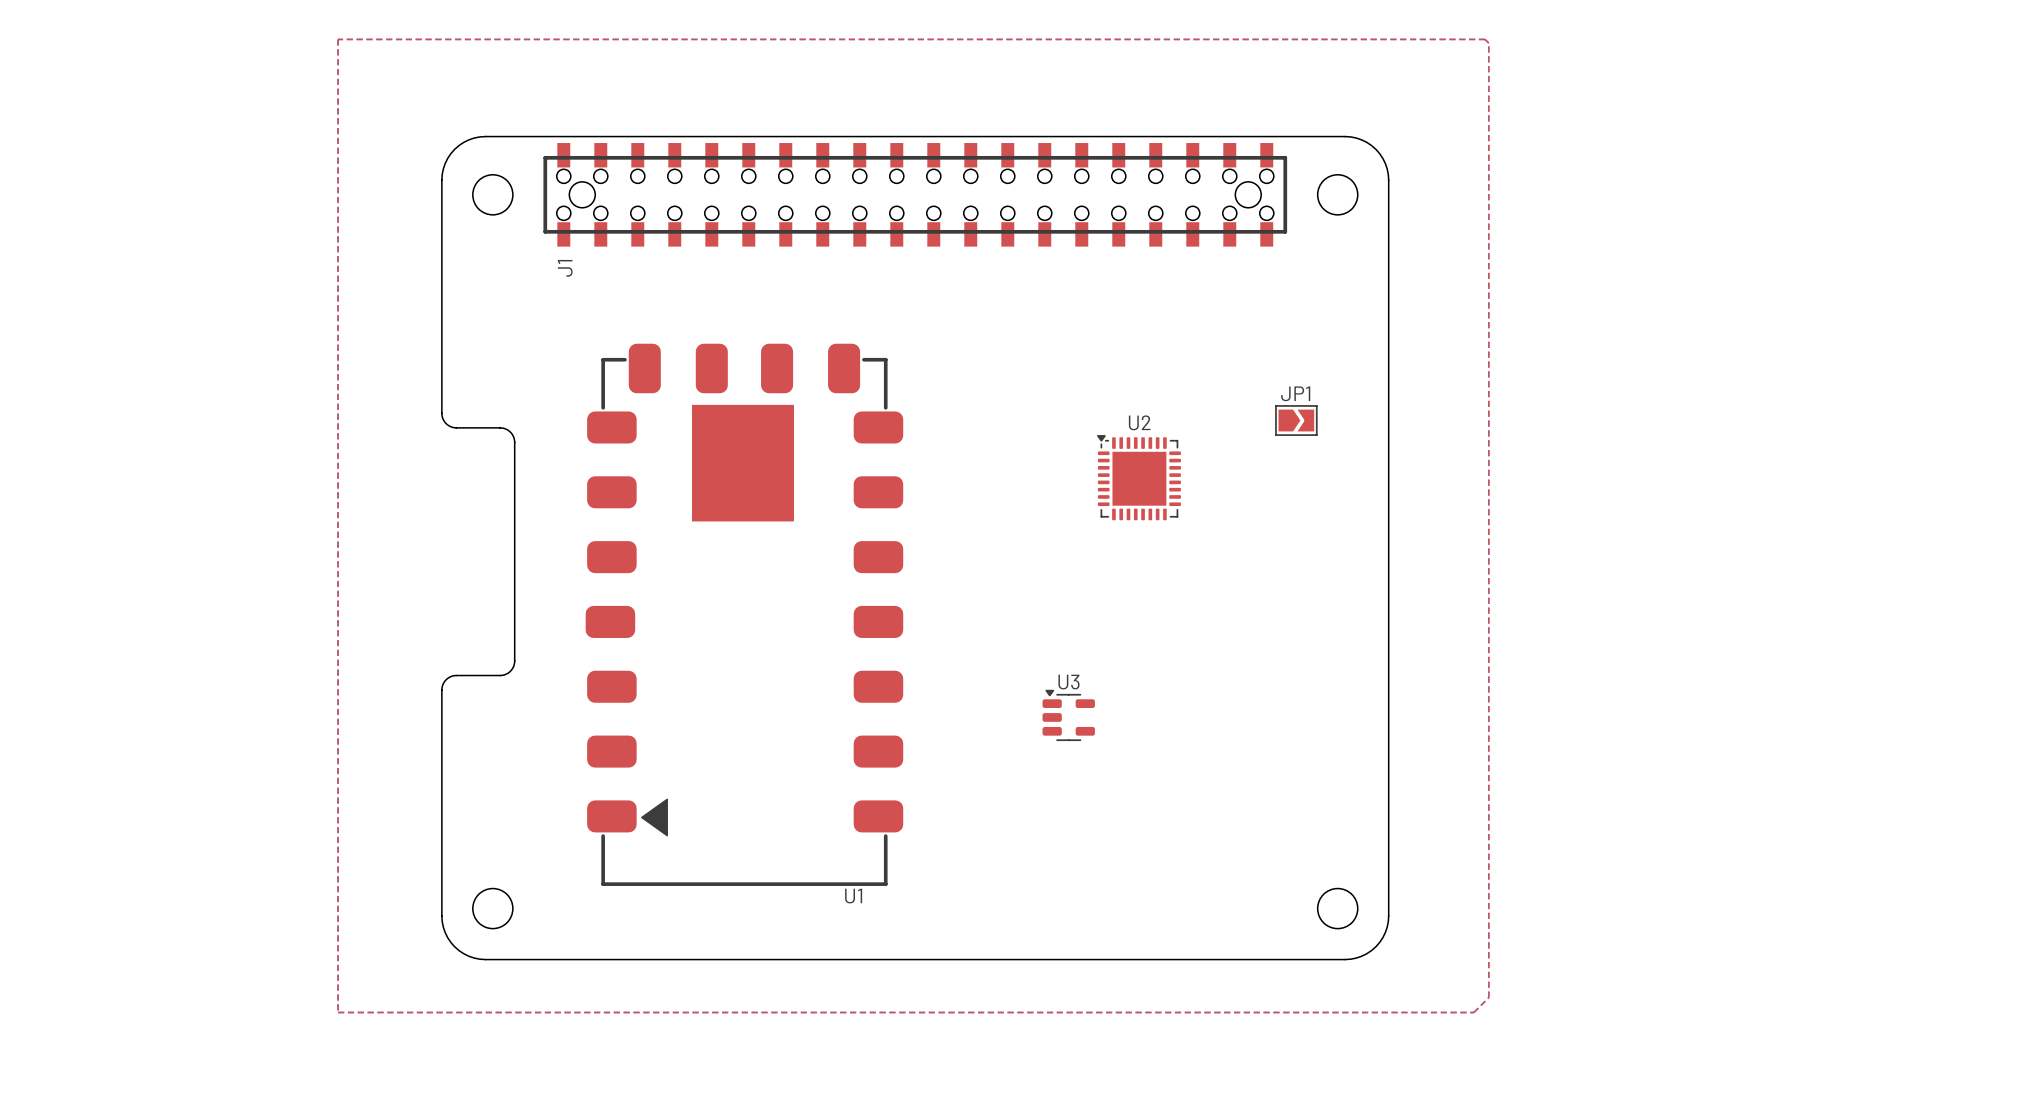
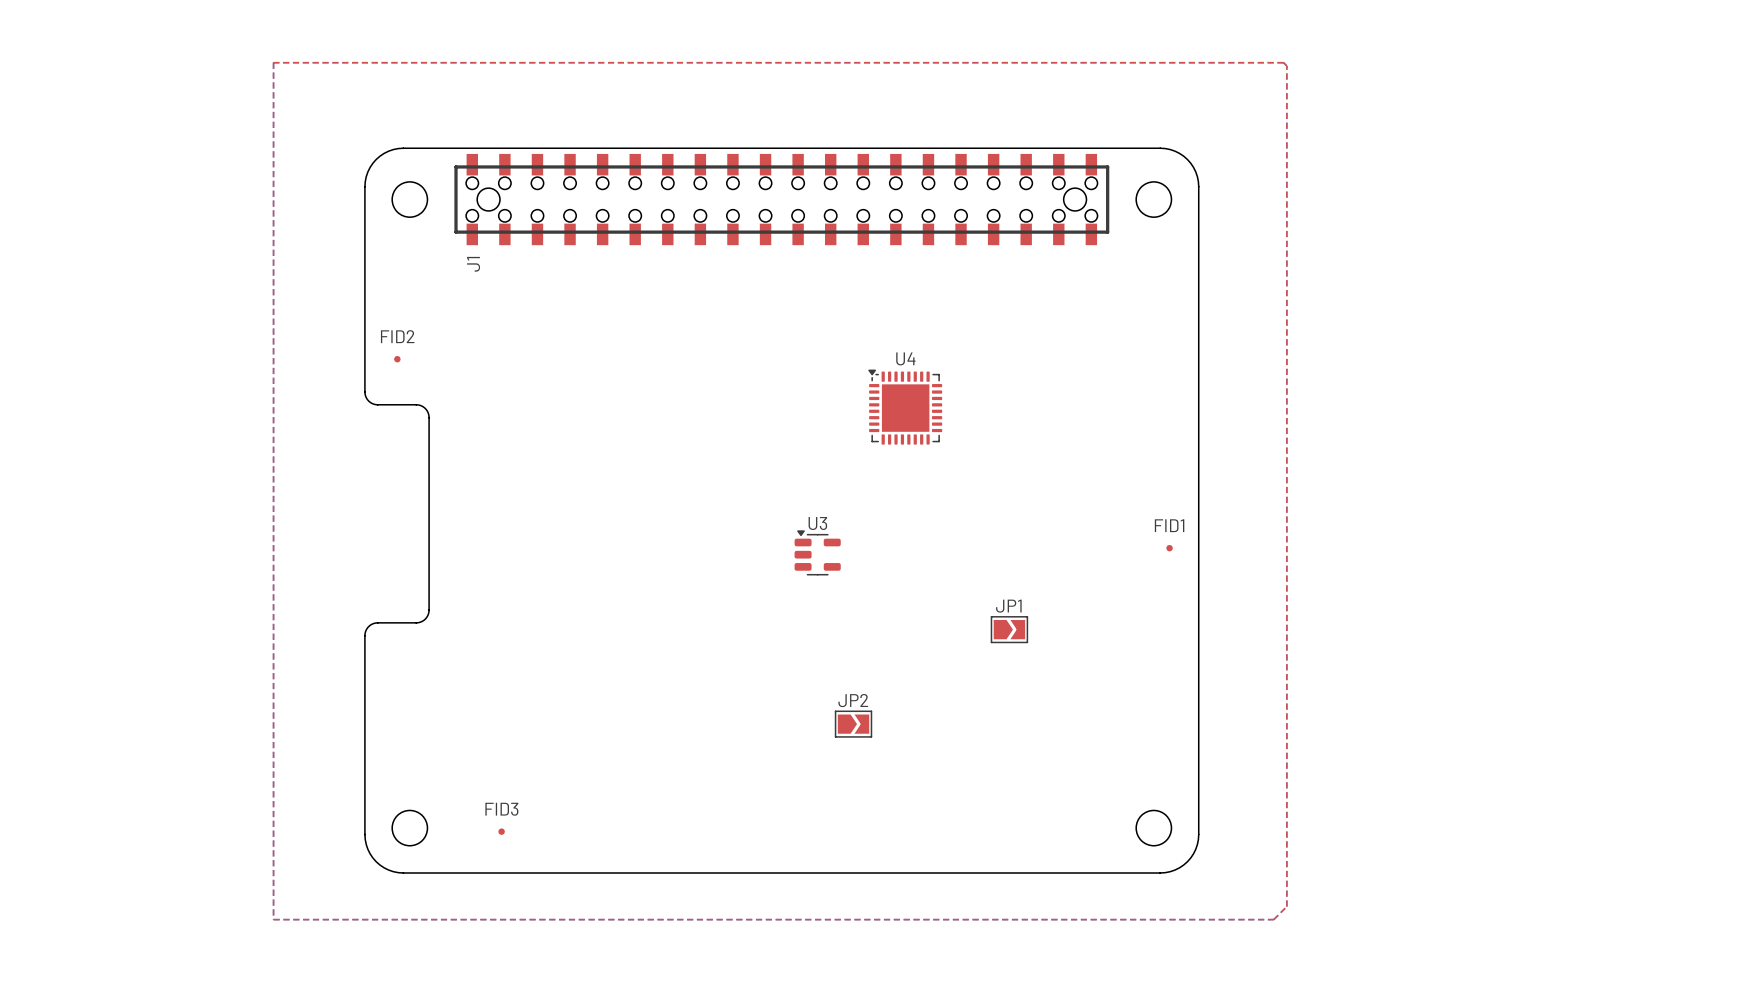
FID2: none -> (397, 359)
JP1 position: (1296, 420) -> (1009, 629)
U4: none -> (905, 407)
U2: (1138, 477) -> none
FID1: none -> (1169, 548)
U1: (744, 614) -> none
U3 position: (1068, 715) -> (817, 552)
JP2: none -> (853, 724)
FID3: none -> (501, 831)

